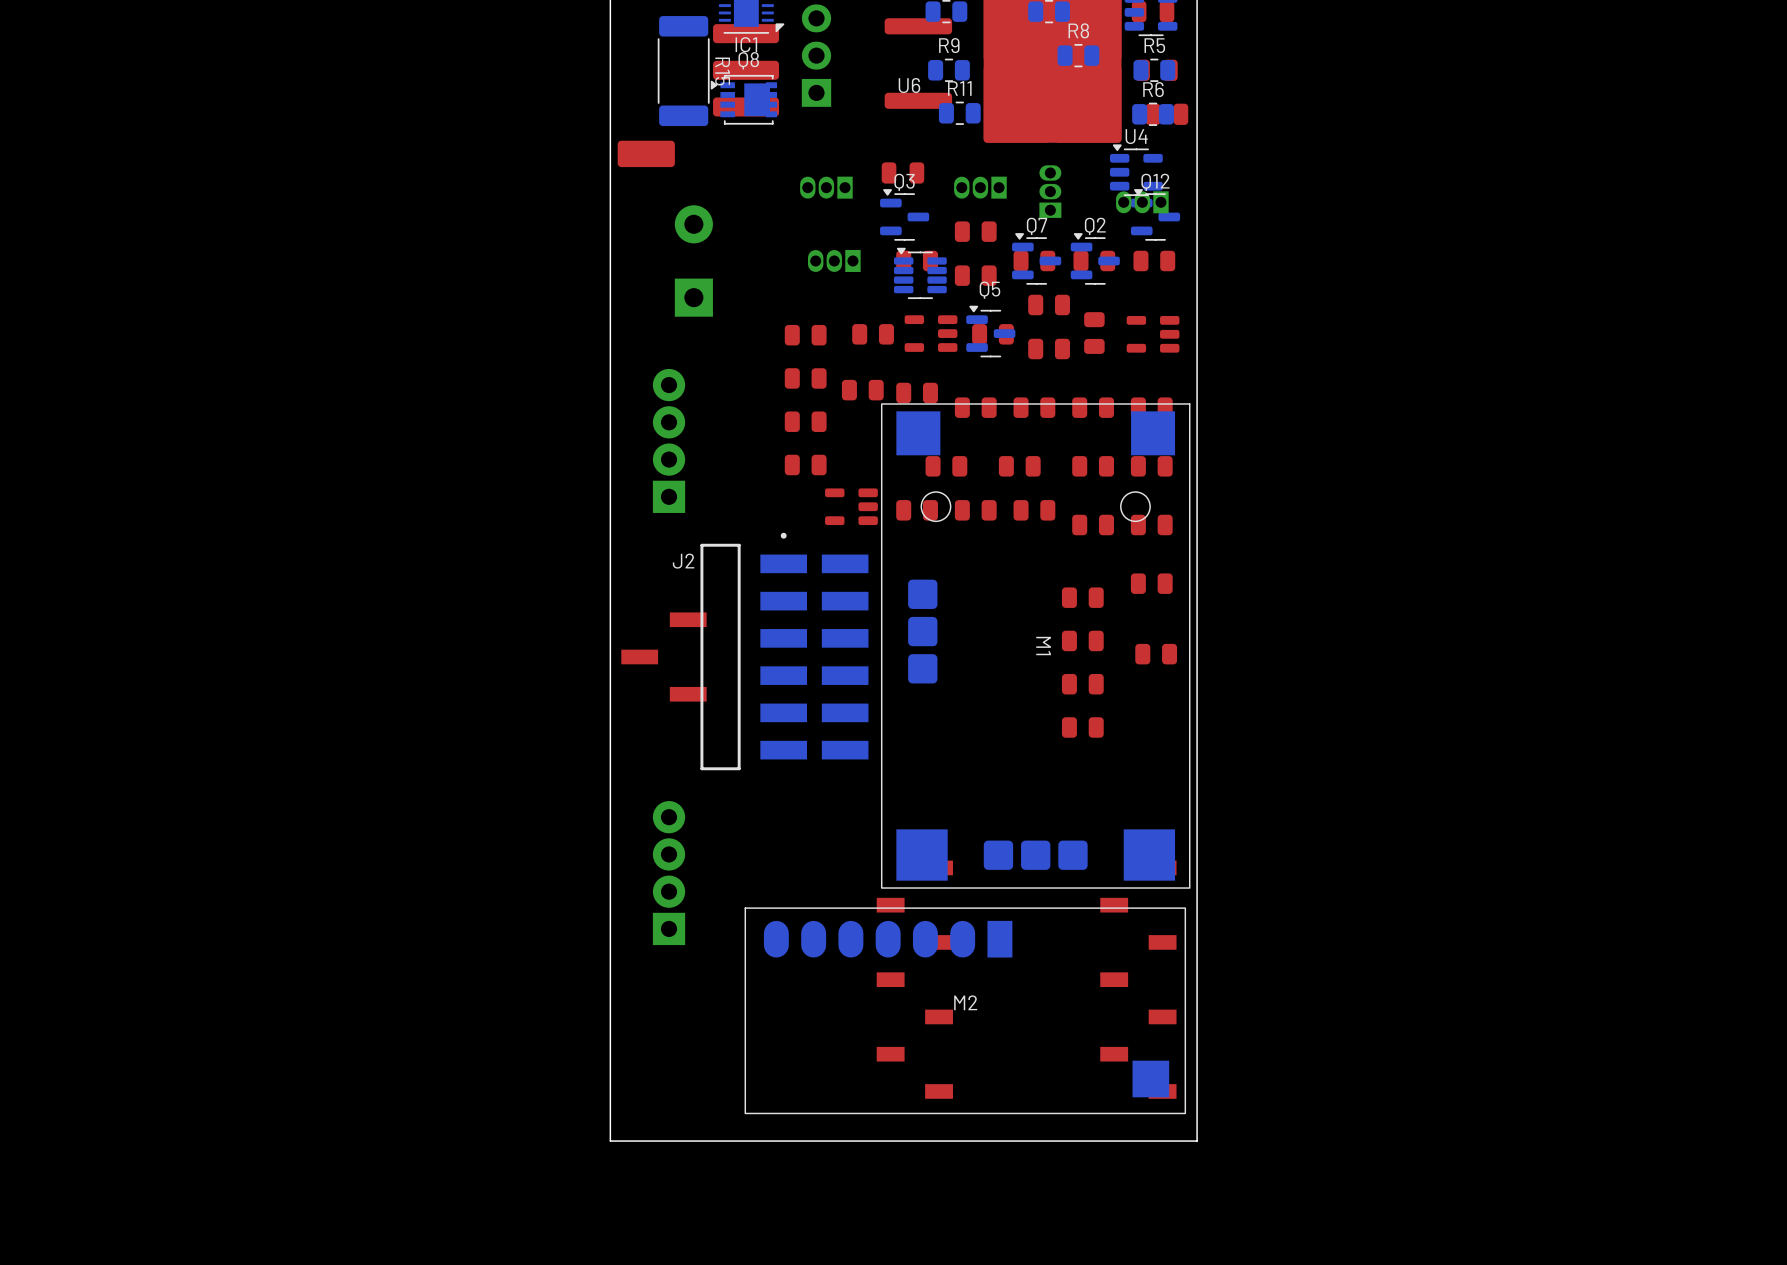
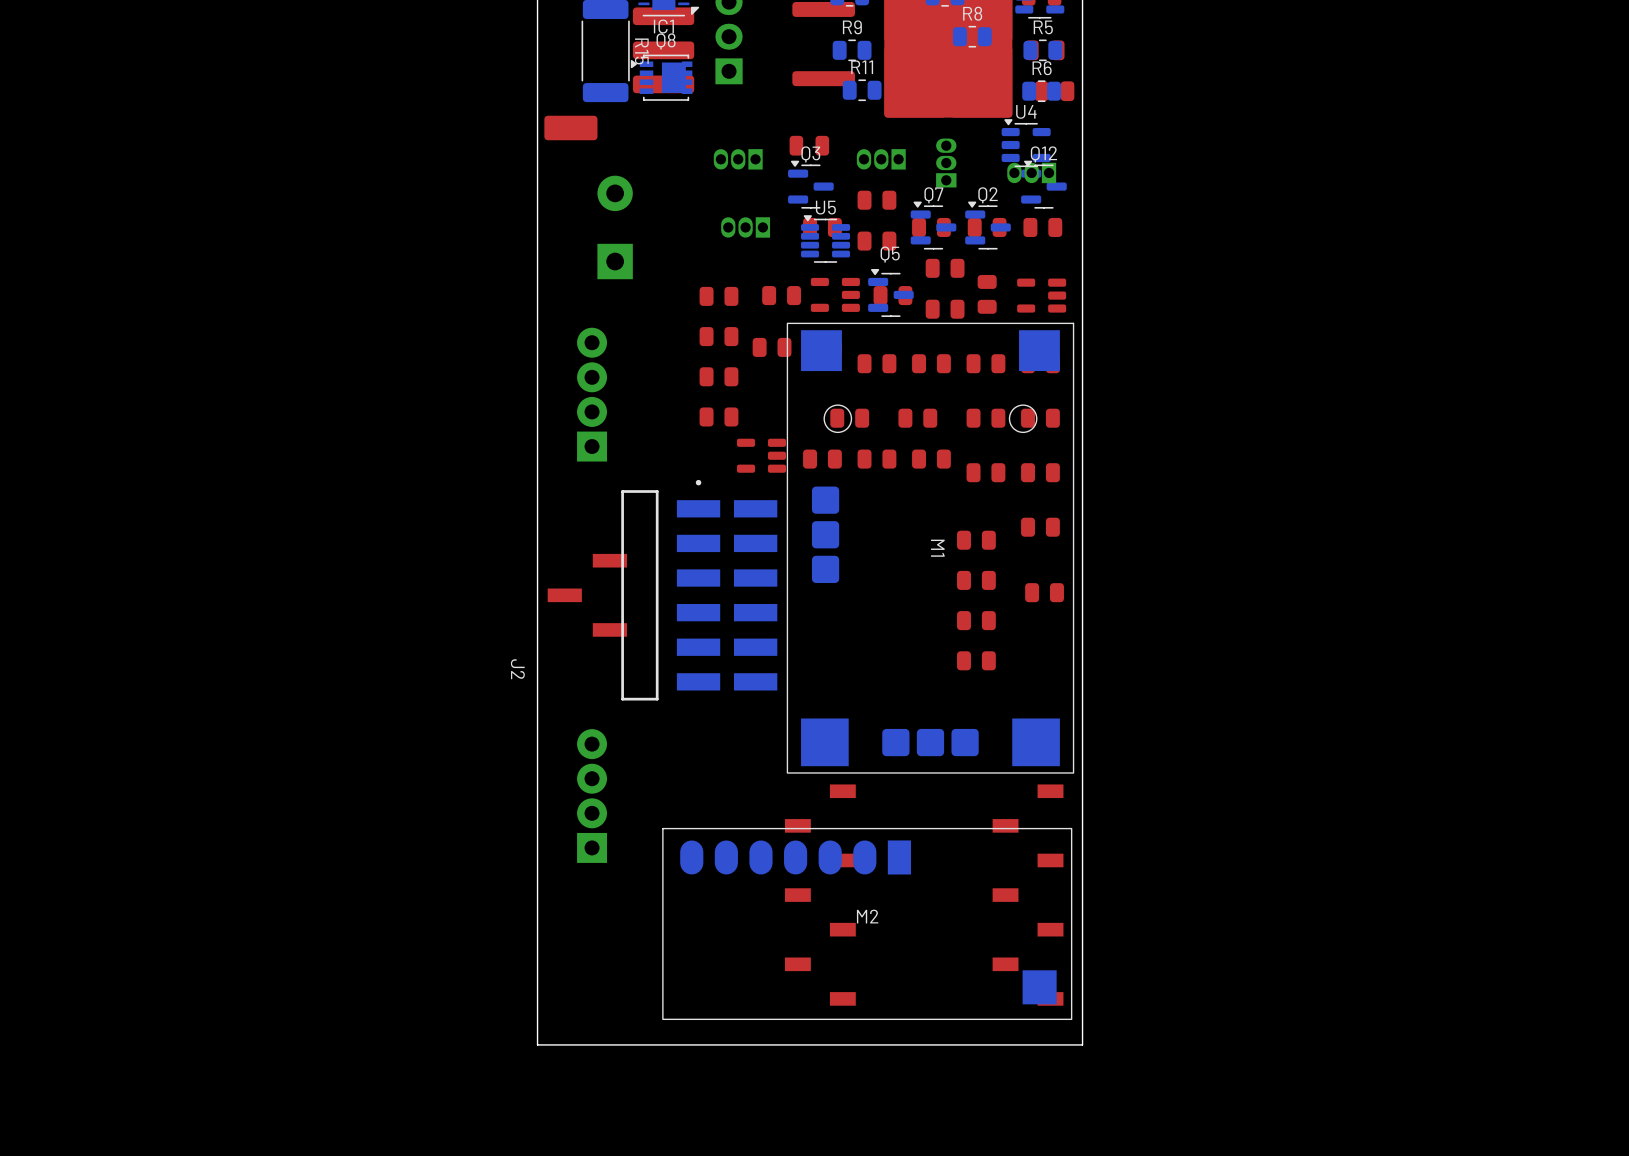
U6 name: U6 (909, 85) -> U5 (825, 207)
J2 name rotation: 0° (683, 561) -> 90° clockwise (517, 669)
J2 name position: J2 (683, 561) -> J2 (517, 669)
M1 position: (1035, 646) -> (930, 548)

